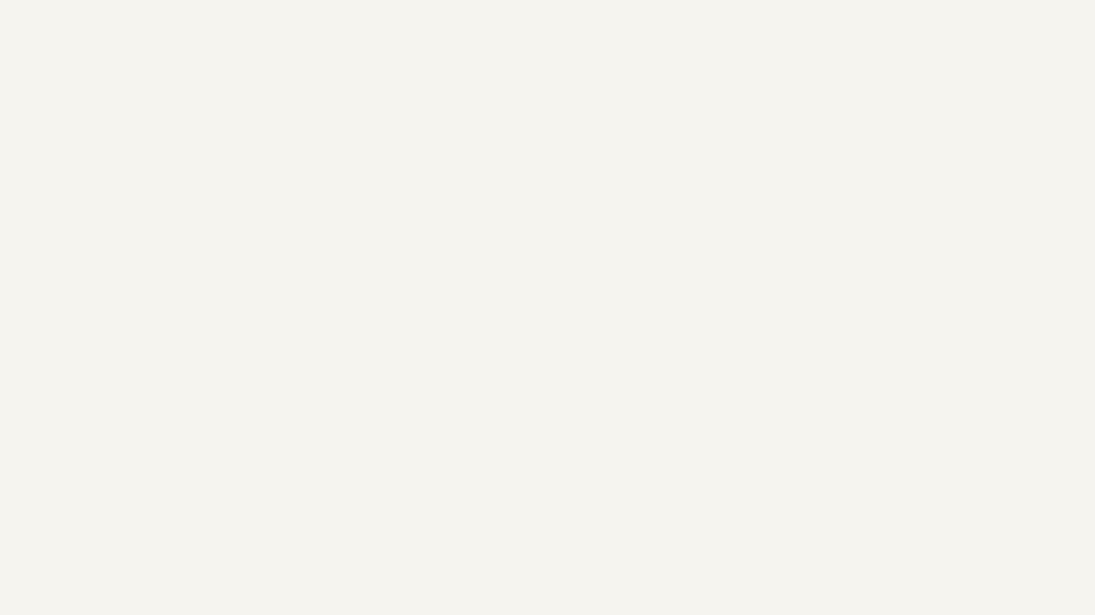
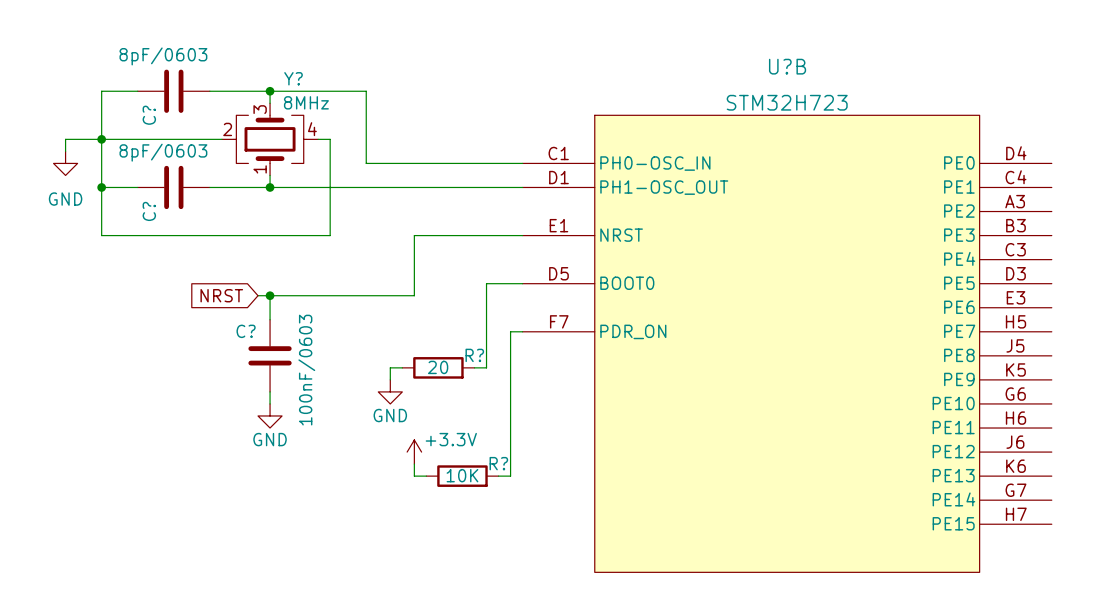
wire: none -> (137, 91) (101, 91) (101, 235) (330, 235) (330, 139) (318, 139)
C?: none -> 8pF/0603 (173, 91)
wire: none -> (209, 91) (366, 91) (366, 163) (522, 163)
wire: none -> (270, 91) (270, 103)
junction: none -> (270, 91)
junction: none -> (101, 139)
wire: none -> (221, 139) (65, 139) (65, 151)
Y?: none -> 8MHz (270, 139)
power symbol: none -> GND (65, 163)
wire: none -> (270, 175) (270, 187)
wire: none -> (101, 187) (137, 187)
junction: none -> (101, 187)
C?: none -> 8pF/0603 (173, 187)
wire: none -> (209, 187) (522, 187)
junction: none -> (270, 187)
wire: none -> (522, 235) (414, 235) (414, 295) (258, 295)
wire: none -> (522, 283) (486, 283) (486, 367) (474, 367)
global label: none -> NRST (221, 295)
wire: none -> (270, 295) (270, 319)
junction: none -> (270, 295)
wire: none -> (522, 331) (510, 331) (510, 476) (498, 476)
U?B: none -> STM32H723 (787, 343)
C?: none -> 100nF/0603 (270, 355)
wire: none -> (402, 367) (390, 367) (390, 379)
R?: none -> 20 (438, 367)
wire: none -> (270, 391) (270, 403)
power symbol: none -> GND (390, 391)
power symbol: none -> GND (270, 415)
power symbol: none -> +3.3V (414, 452)
wire: none -> (414, 464) (414, 476) (426, 476)
R?: none -> 10K (462, 476)

